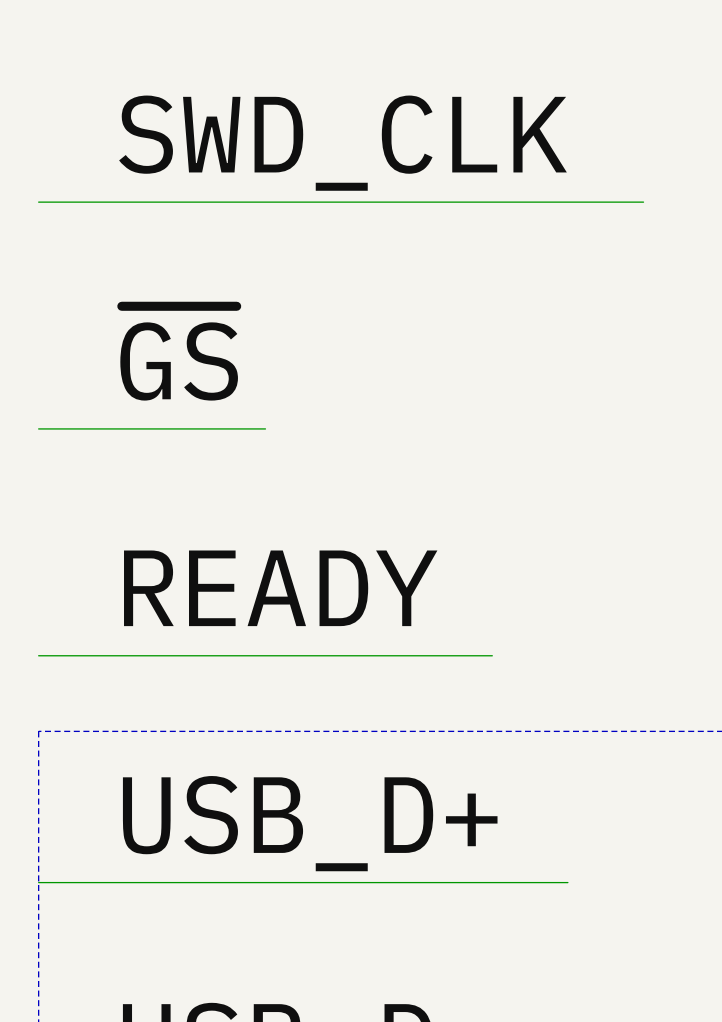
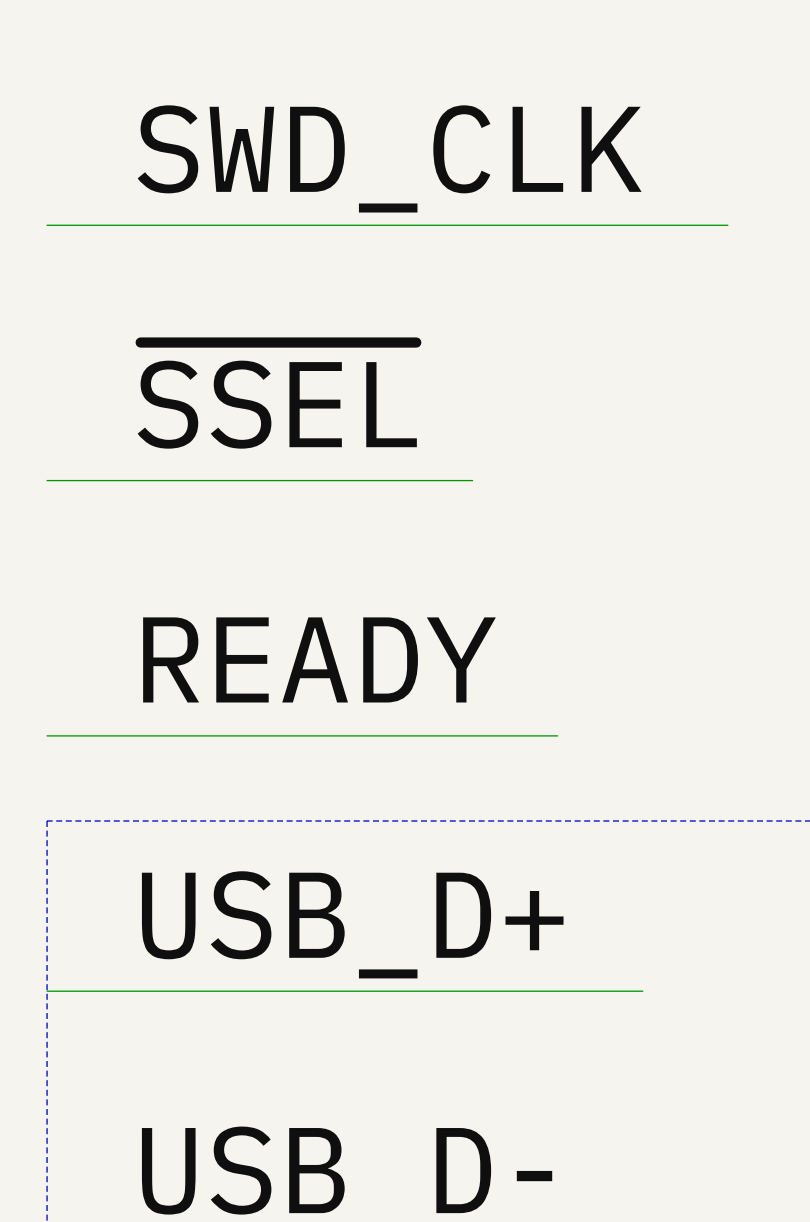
label: ~{GS} (179, 353) -> ~{SSEL} (277, 395)
wire: none -> (302, 480) (472, 480)

